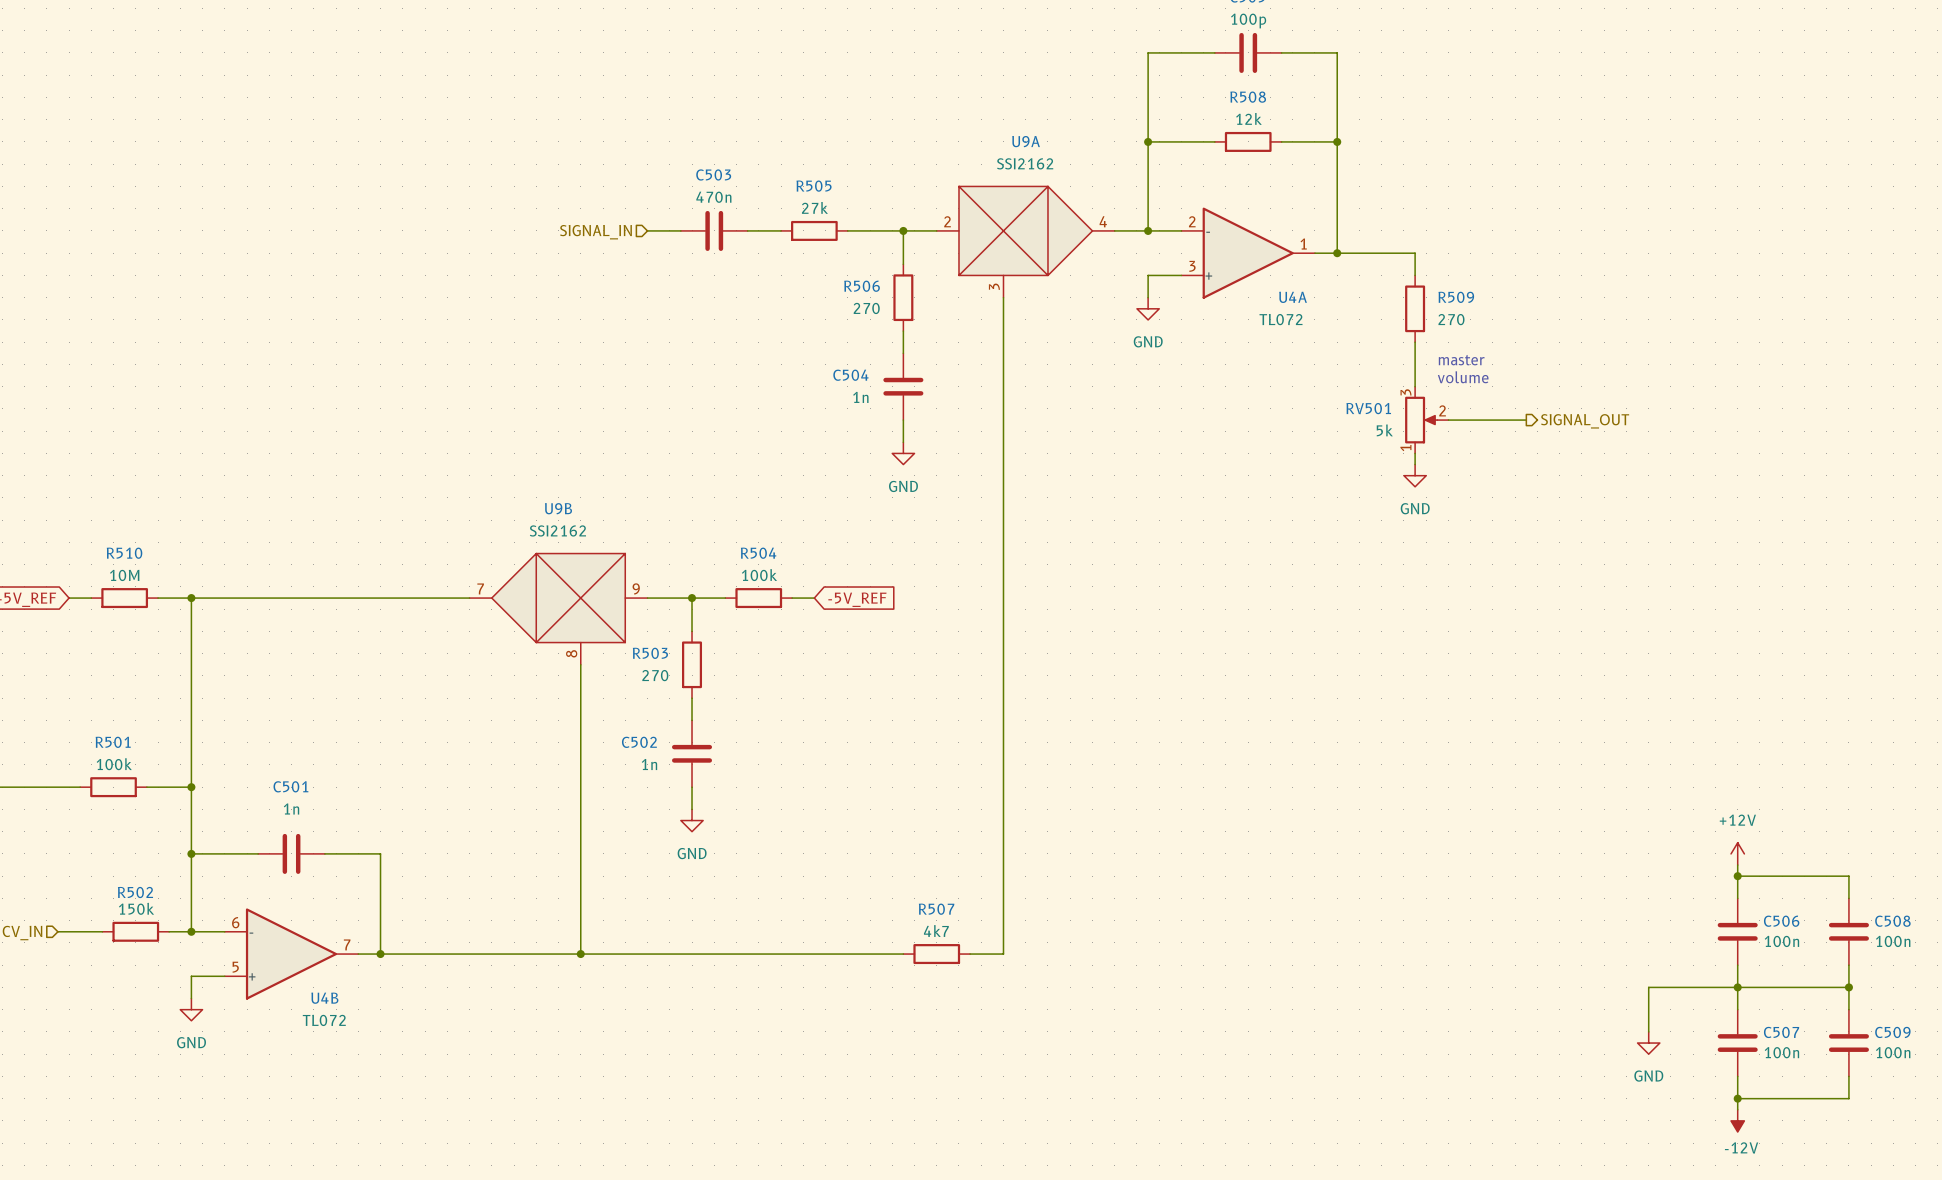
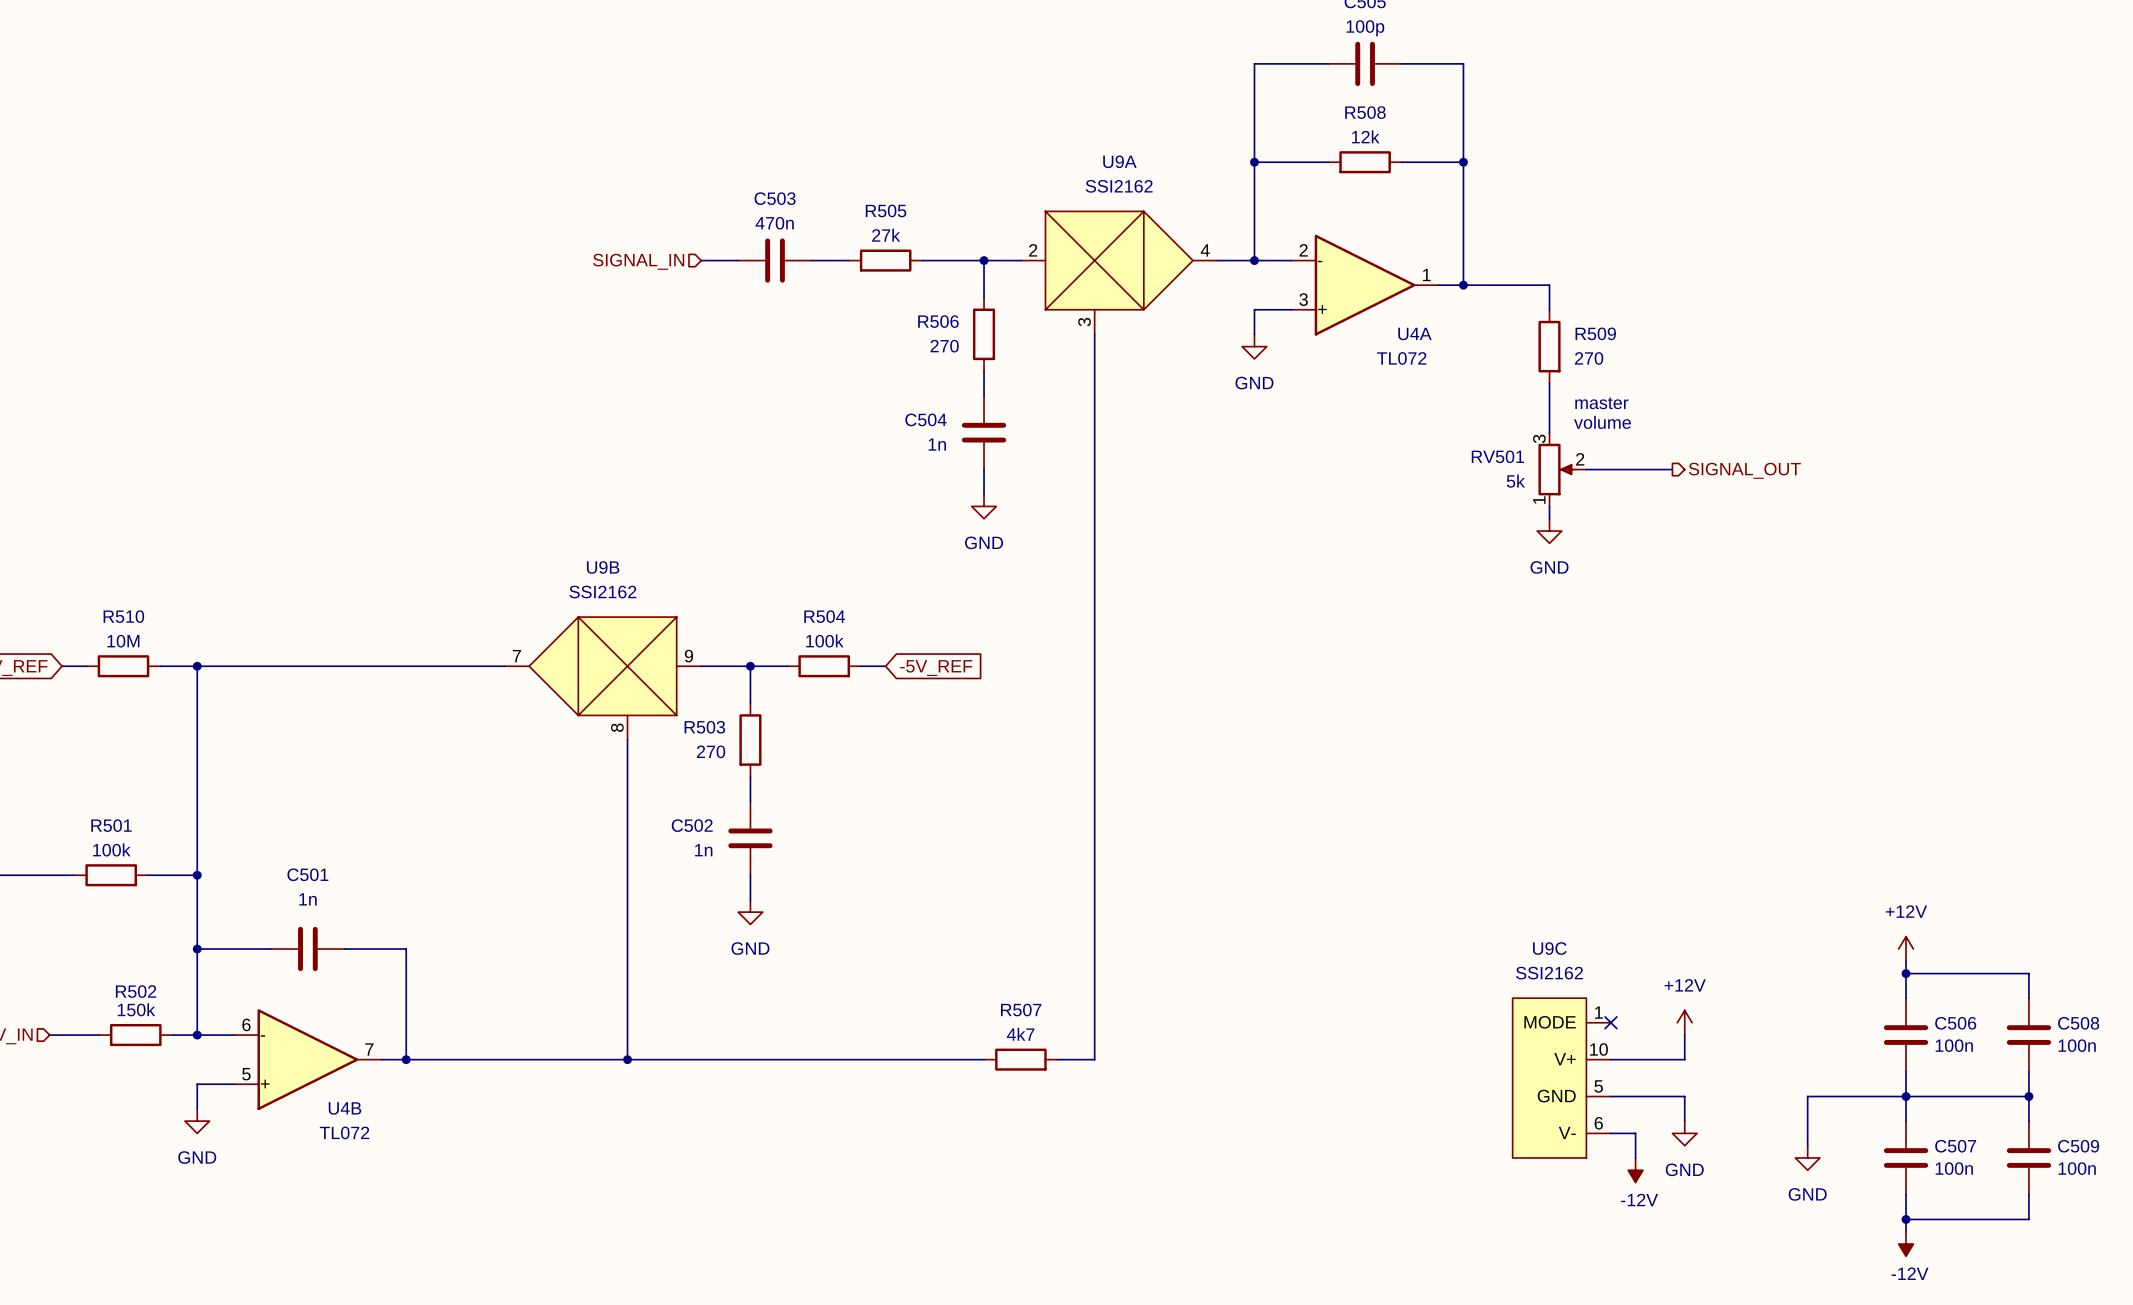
no-connect mark: none -> (1610, 1022)
power symbol: none -> +12V (1684, 1022)
wire: none -> (1684, 1035) (1684, 1059) (1610, 1059)
U9C: none -> SSI2162 (1561, 1078)
wire: none -> (1610, 1096) (1684, 1096) (1684, 1121)
wire: none -> (1610, 1133) (1635, 1133) (1635, 1157)
power symbol: none -> GND (1684, 1133)
power symbol: none -> -12V (1635, 1170)

